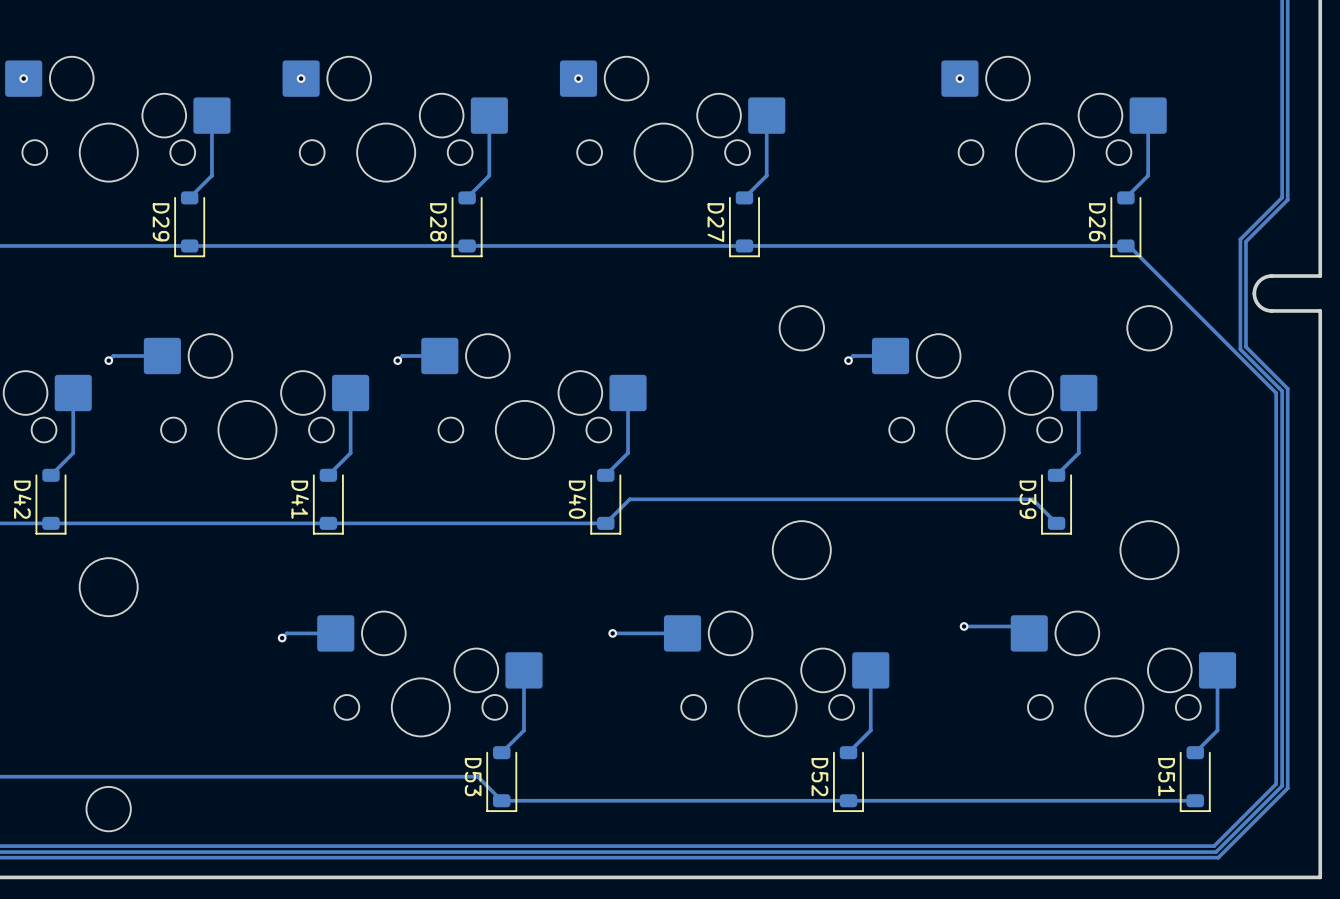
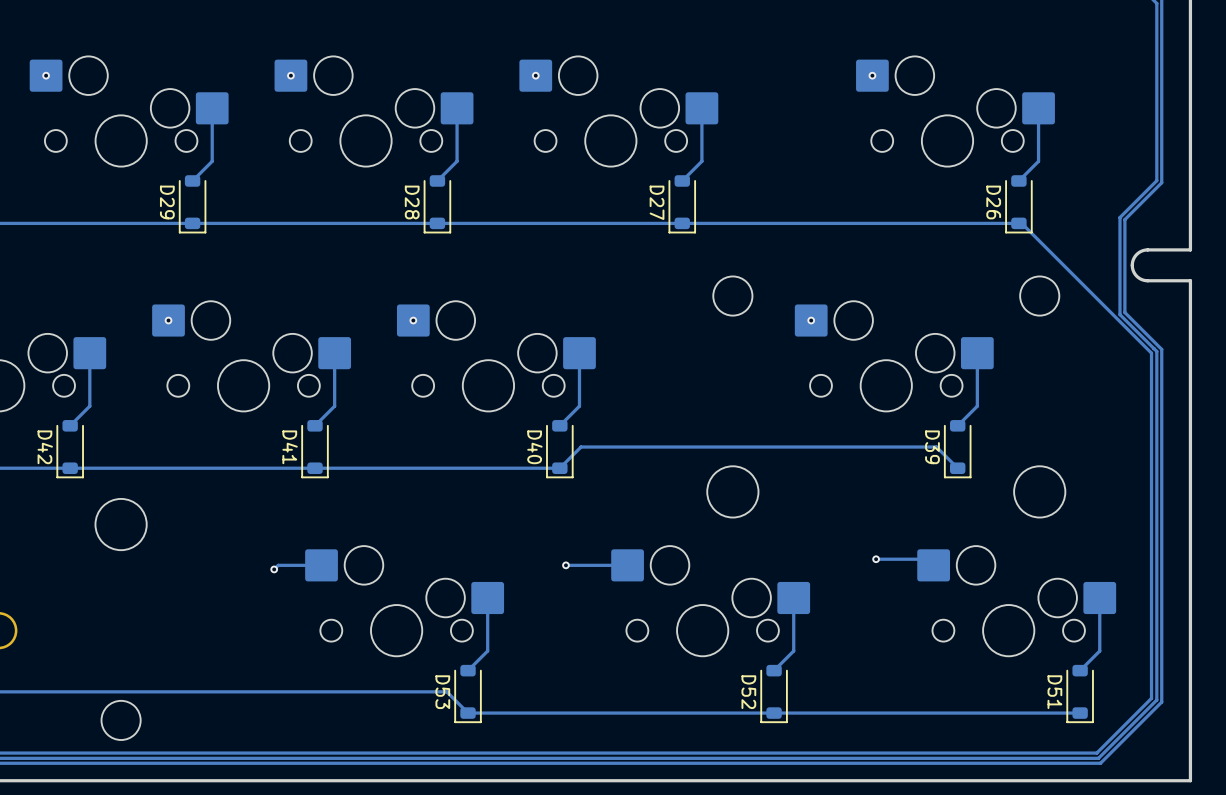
track: (162, 356) (113, 356) (108, 360) -> none
track: (439, 356) (402, 356) (397, 360) -> none
track: (890, 356) (853, 356) (848, 360) -> none
via position: (108, 360) -> (168, 320)
via position: (397, 360) -> (413, 320)
via position: (848, 360) -> (811, 320)

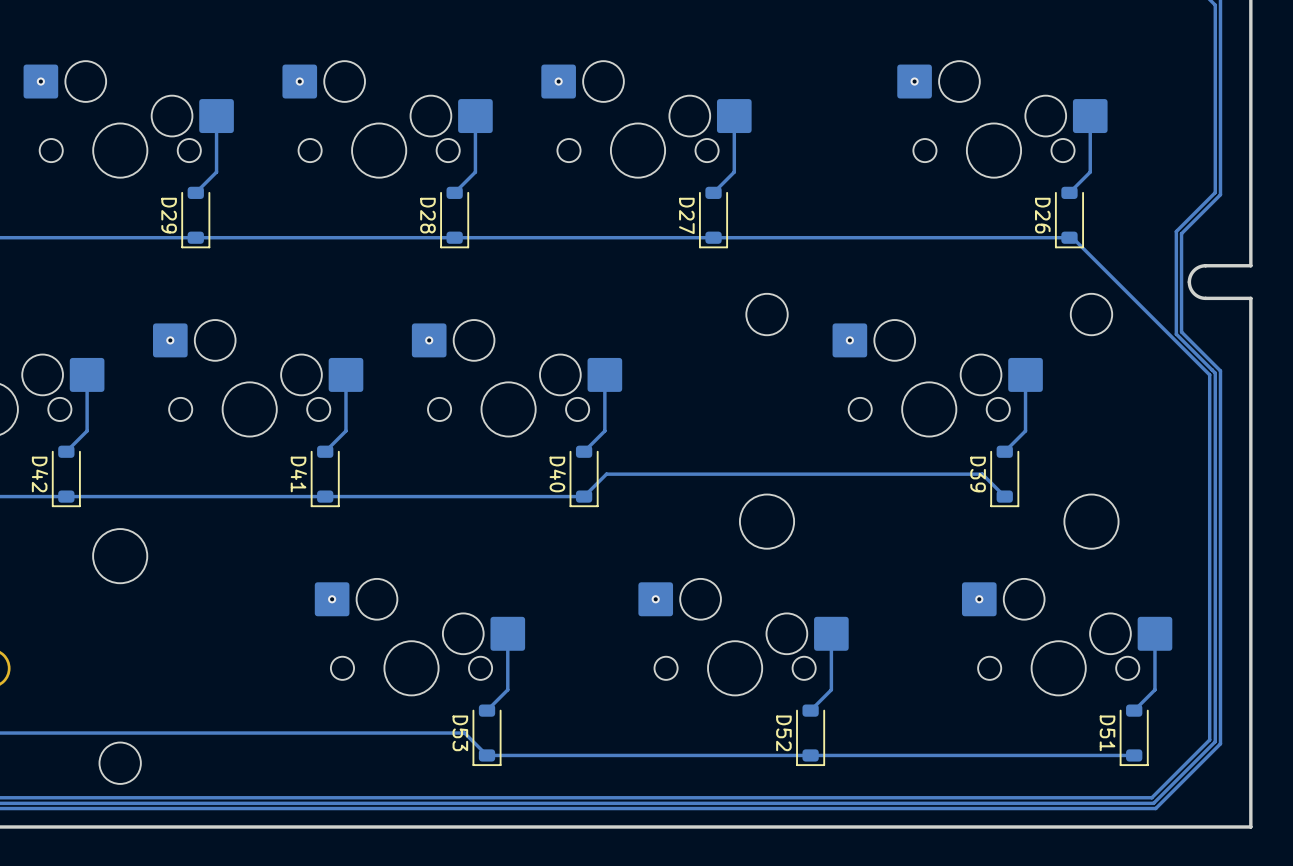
track: (876, 559) (927, 559) (933, 565) -> none
via position: (876, 559) -> (979, 599)
track: (321, 565) (278, 565) (274, 569) (276, 569) -> none
via position: (565, 565) -> (655, 599)
track: (627, 565) (565, 565) -> none
via position: (274, 569) -> (332, 599)

